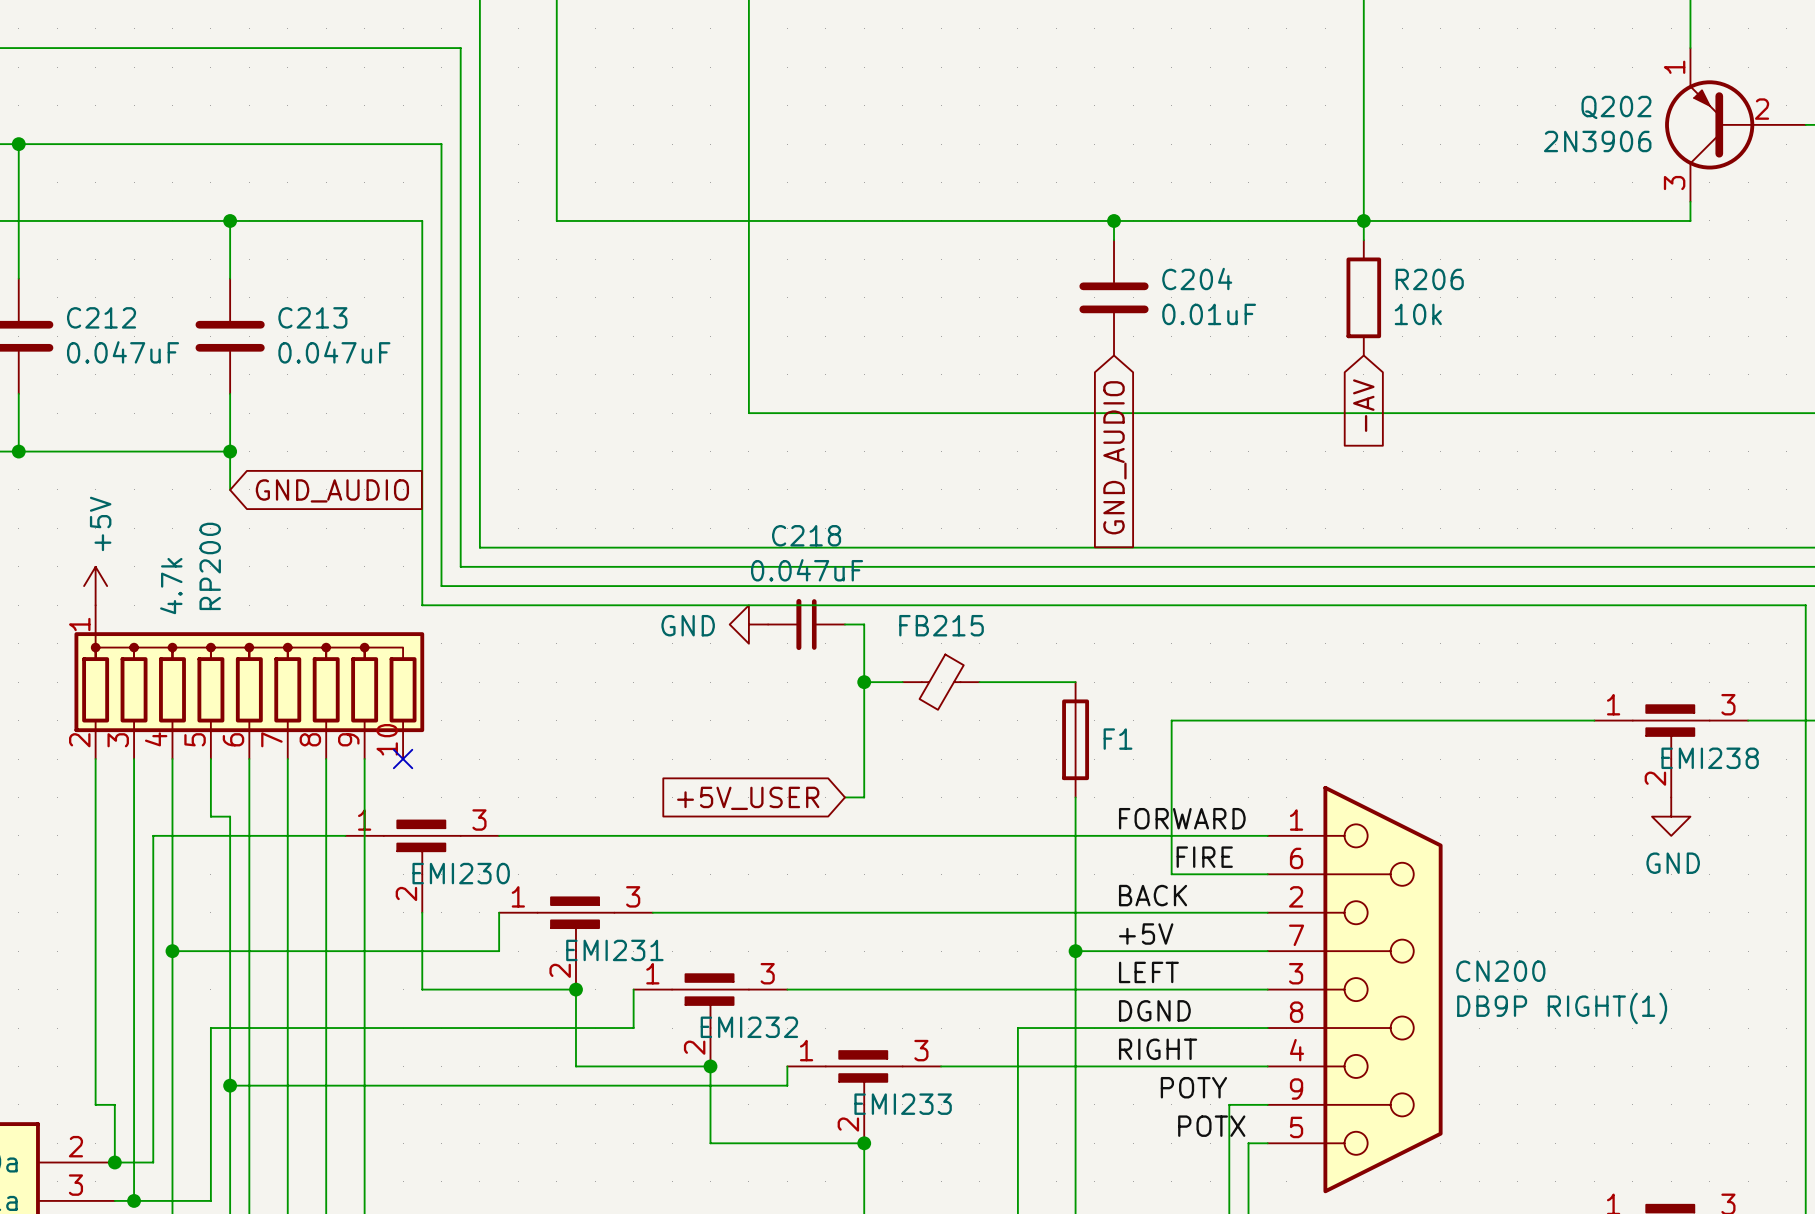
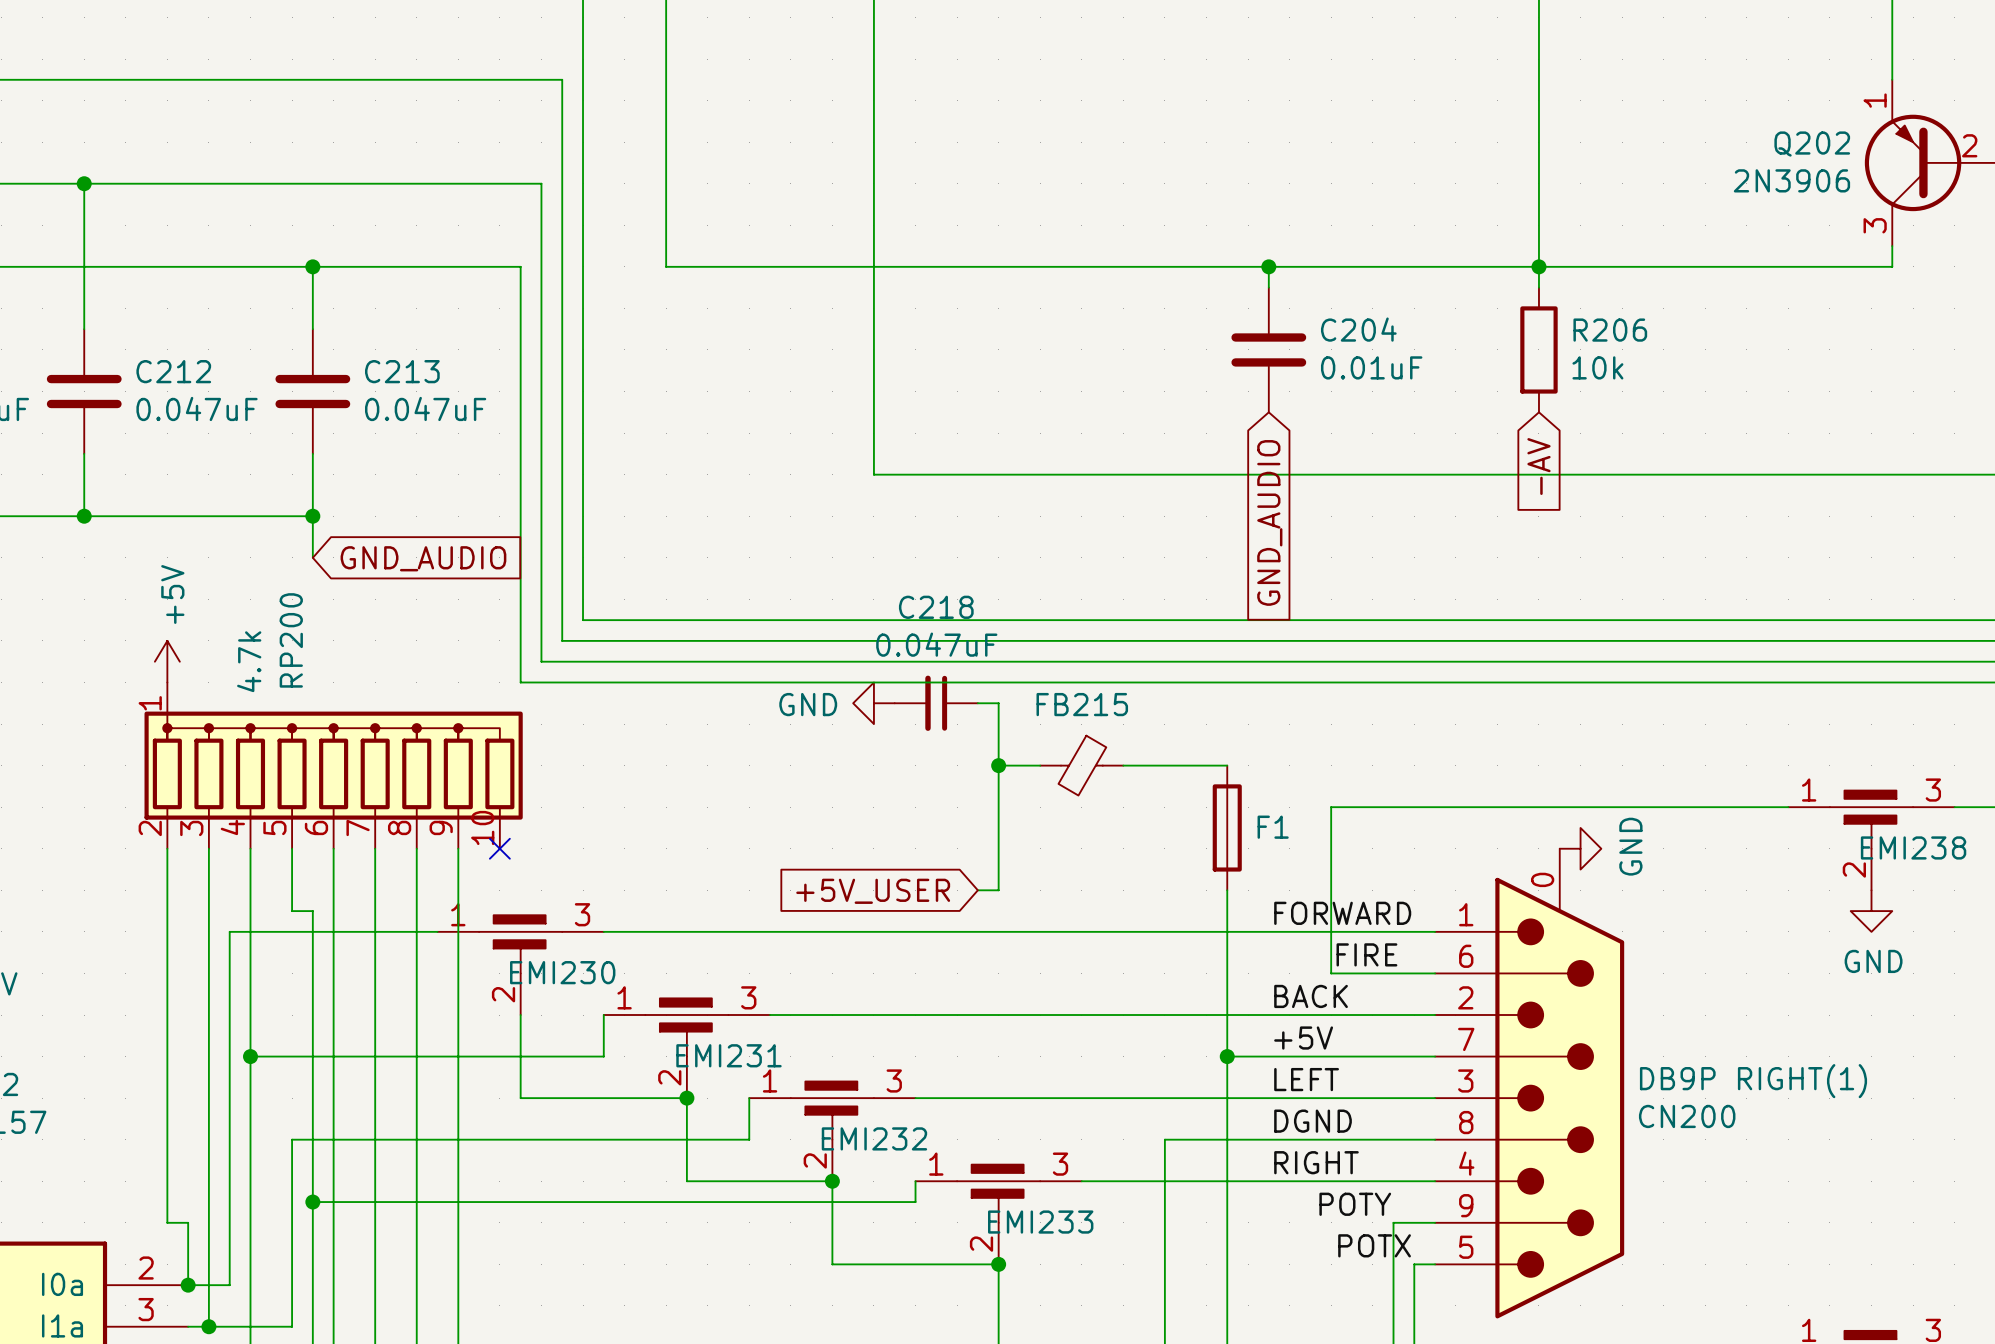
power symbol: none -> GND (1580, 848)
CN200 symbol: [1267, 785, 1443, 1194] -> [1435, 848, 1625, 1319]
CN200 name position: CN200 (1500, 971) -> CN200 (1687, 1116)

